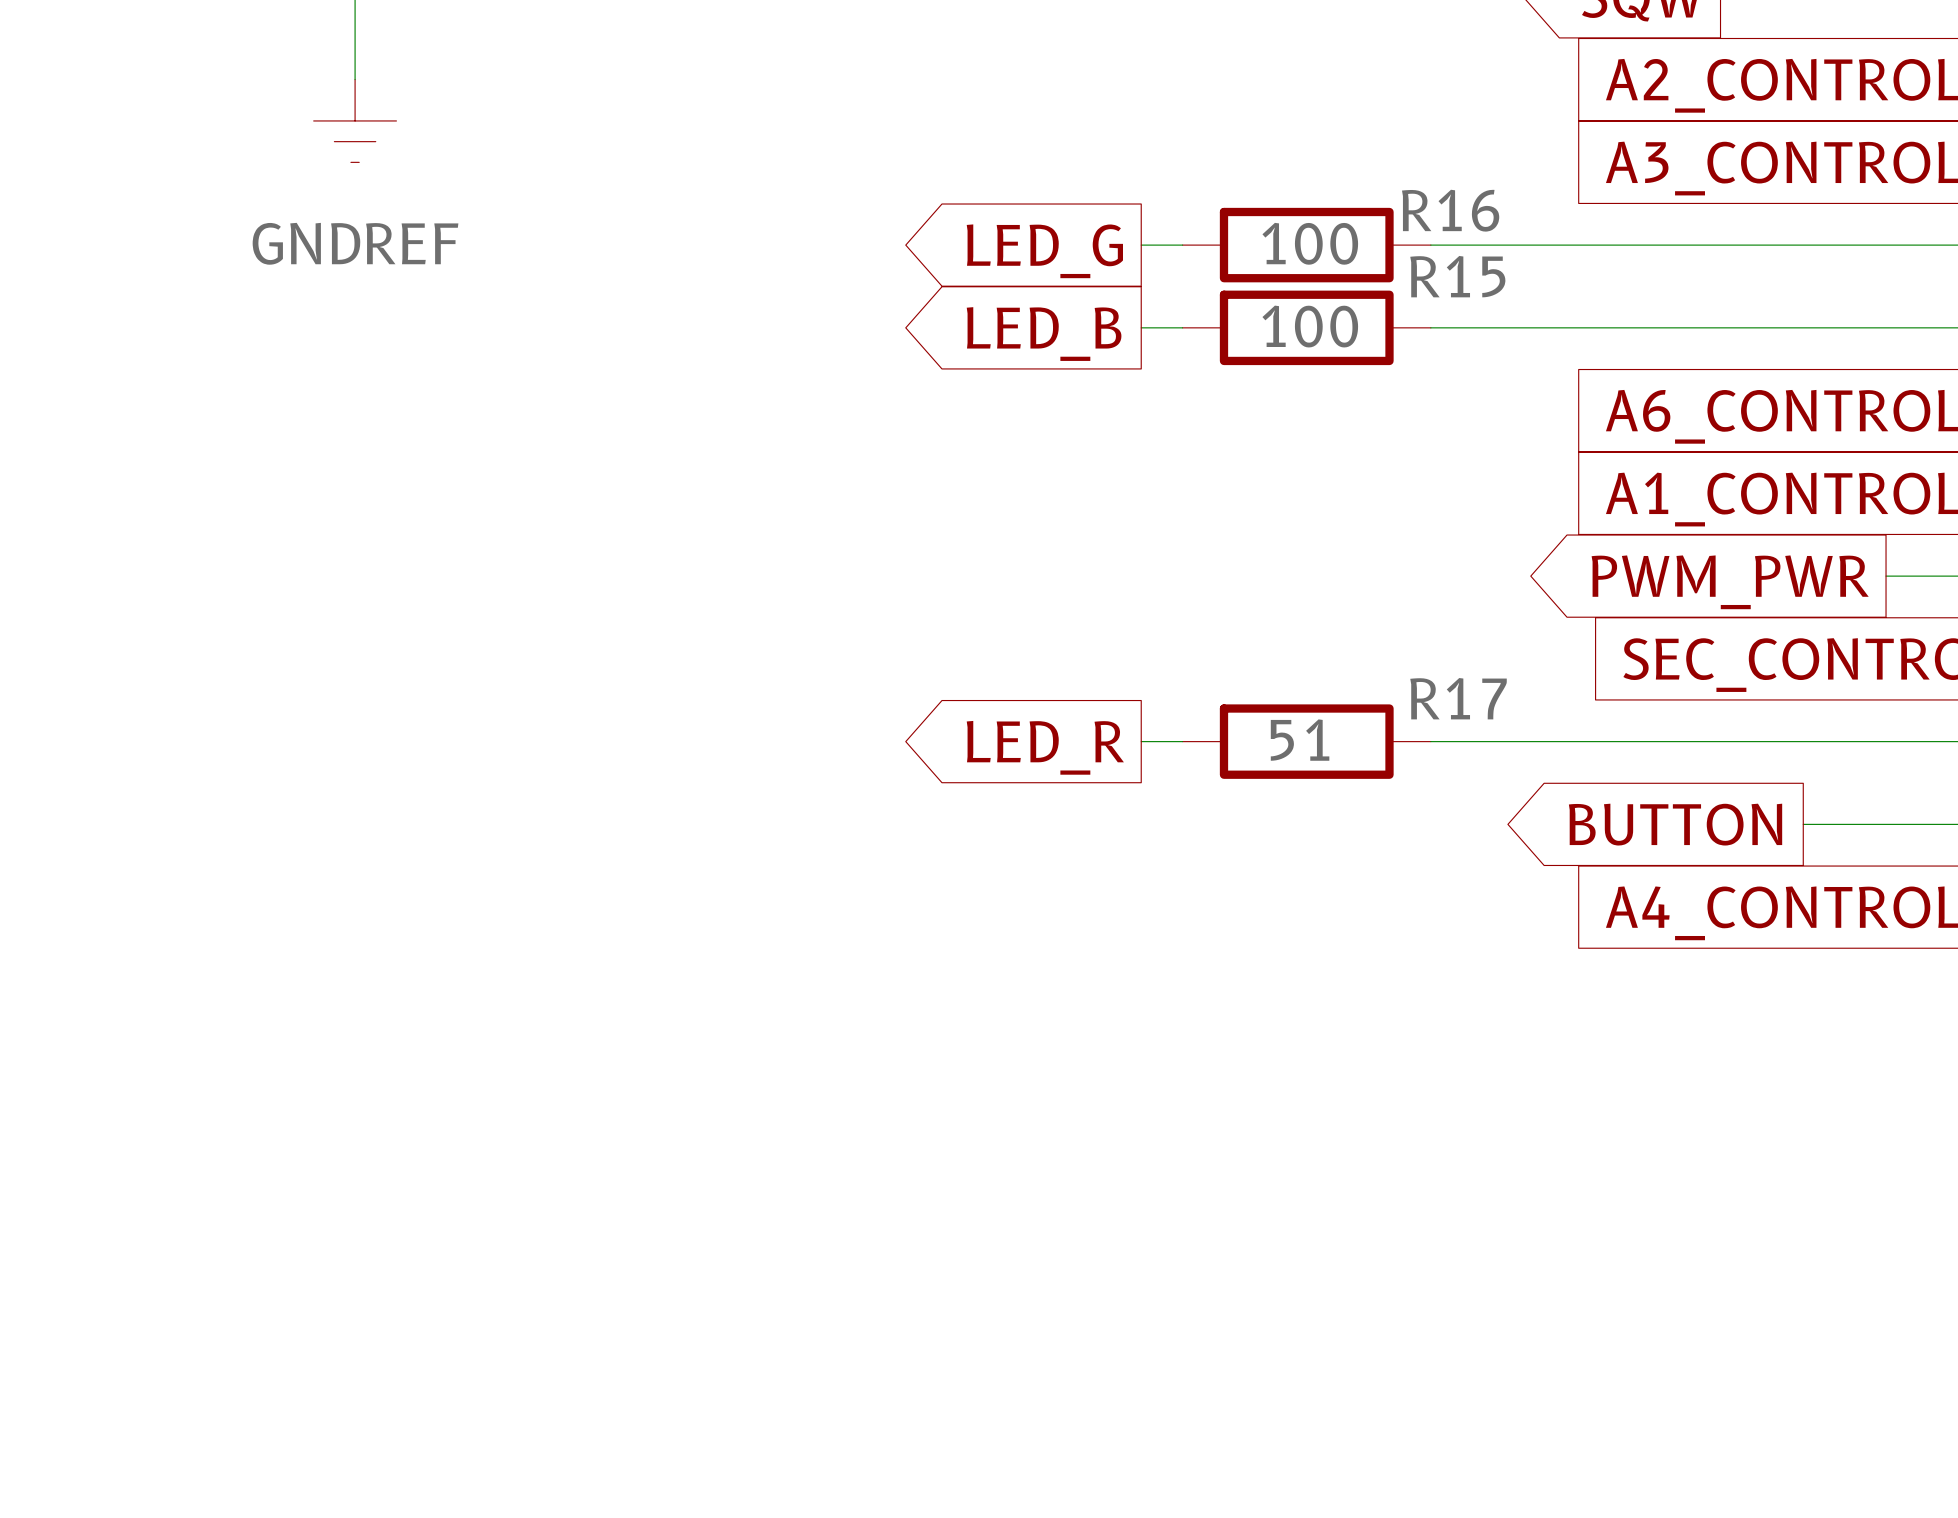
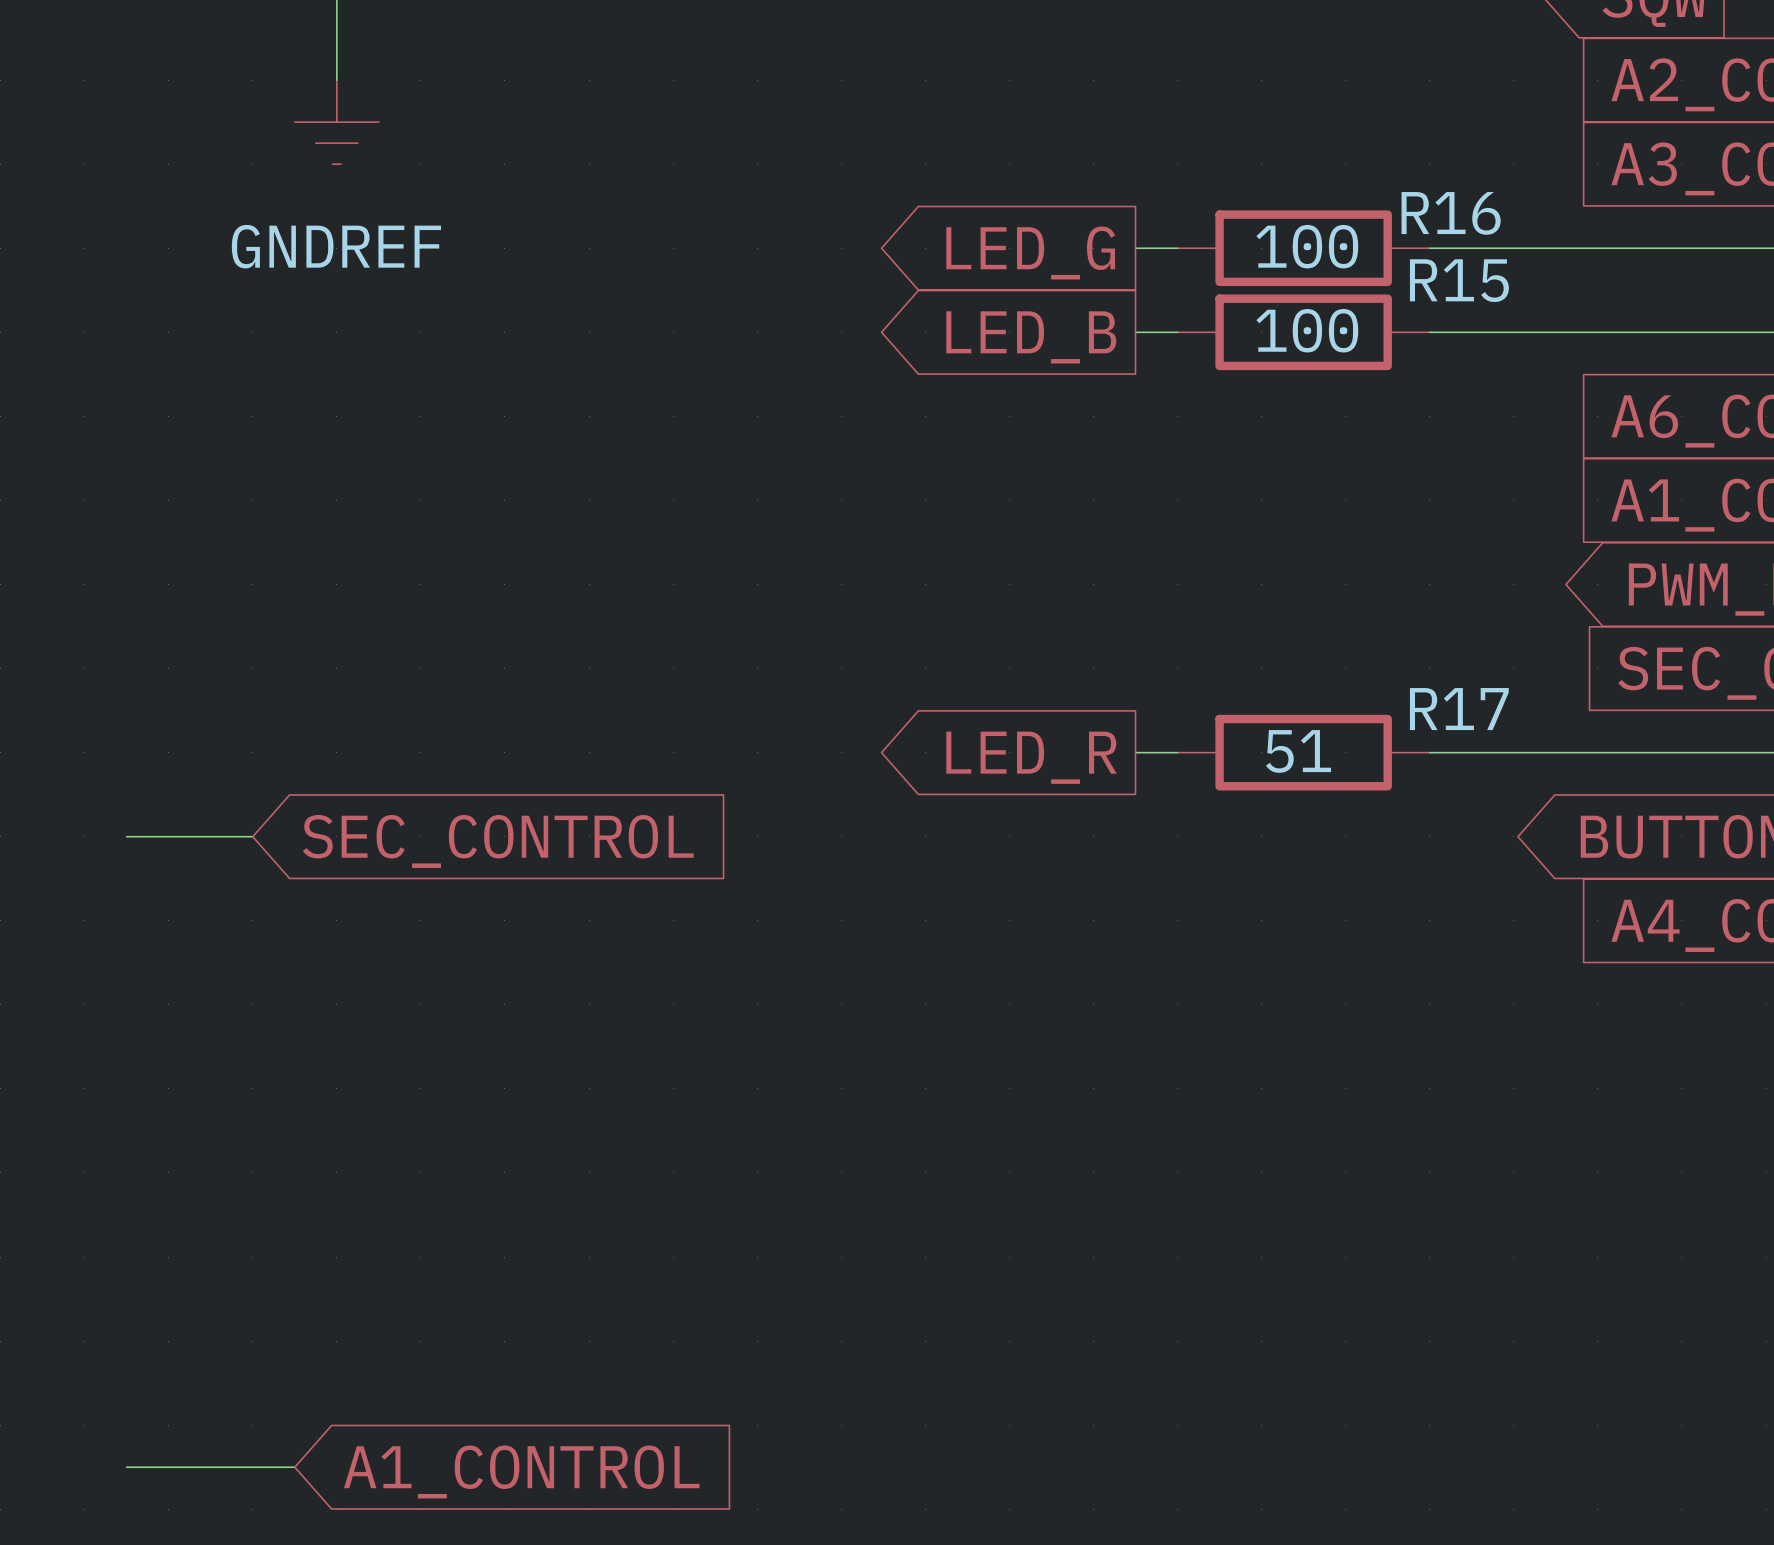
wire: none -> (126, 836) (252, 836)
global label: none -> SEC_CONTROL (498, 841)
wire: none -> (126, 1467) (294, 1467)
global label: none -> A1_CONTROL (521, 1471)

